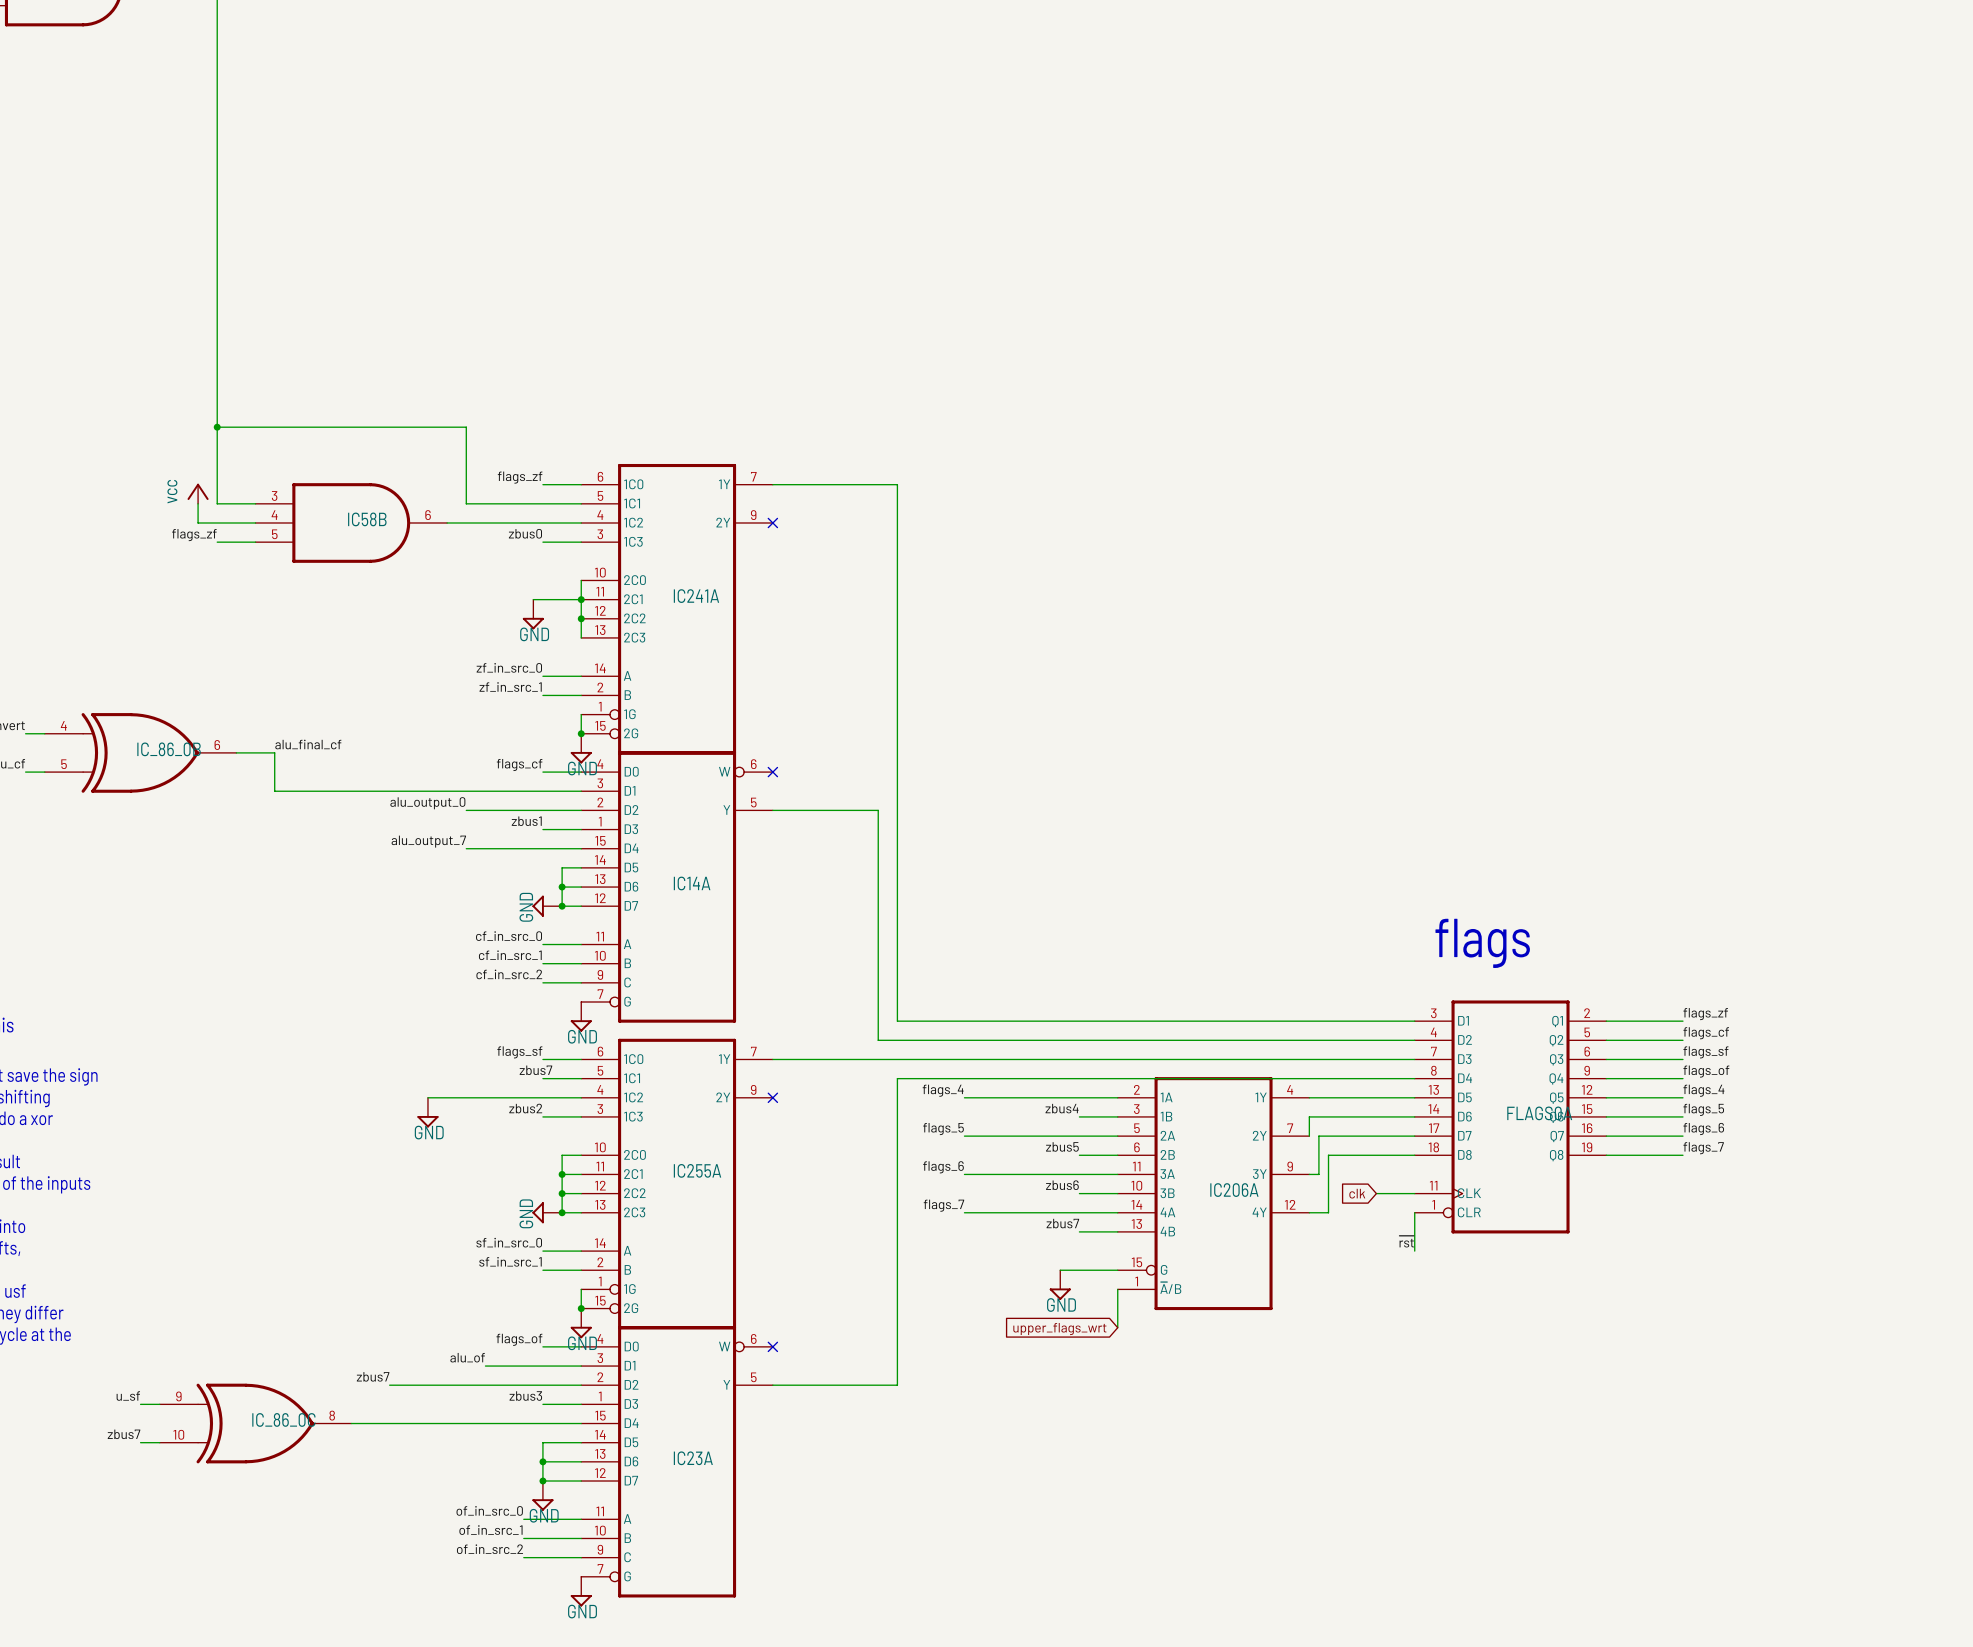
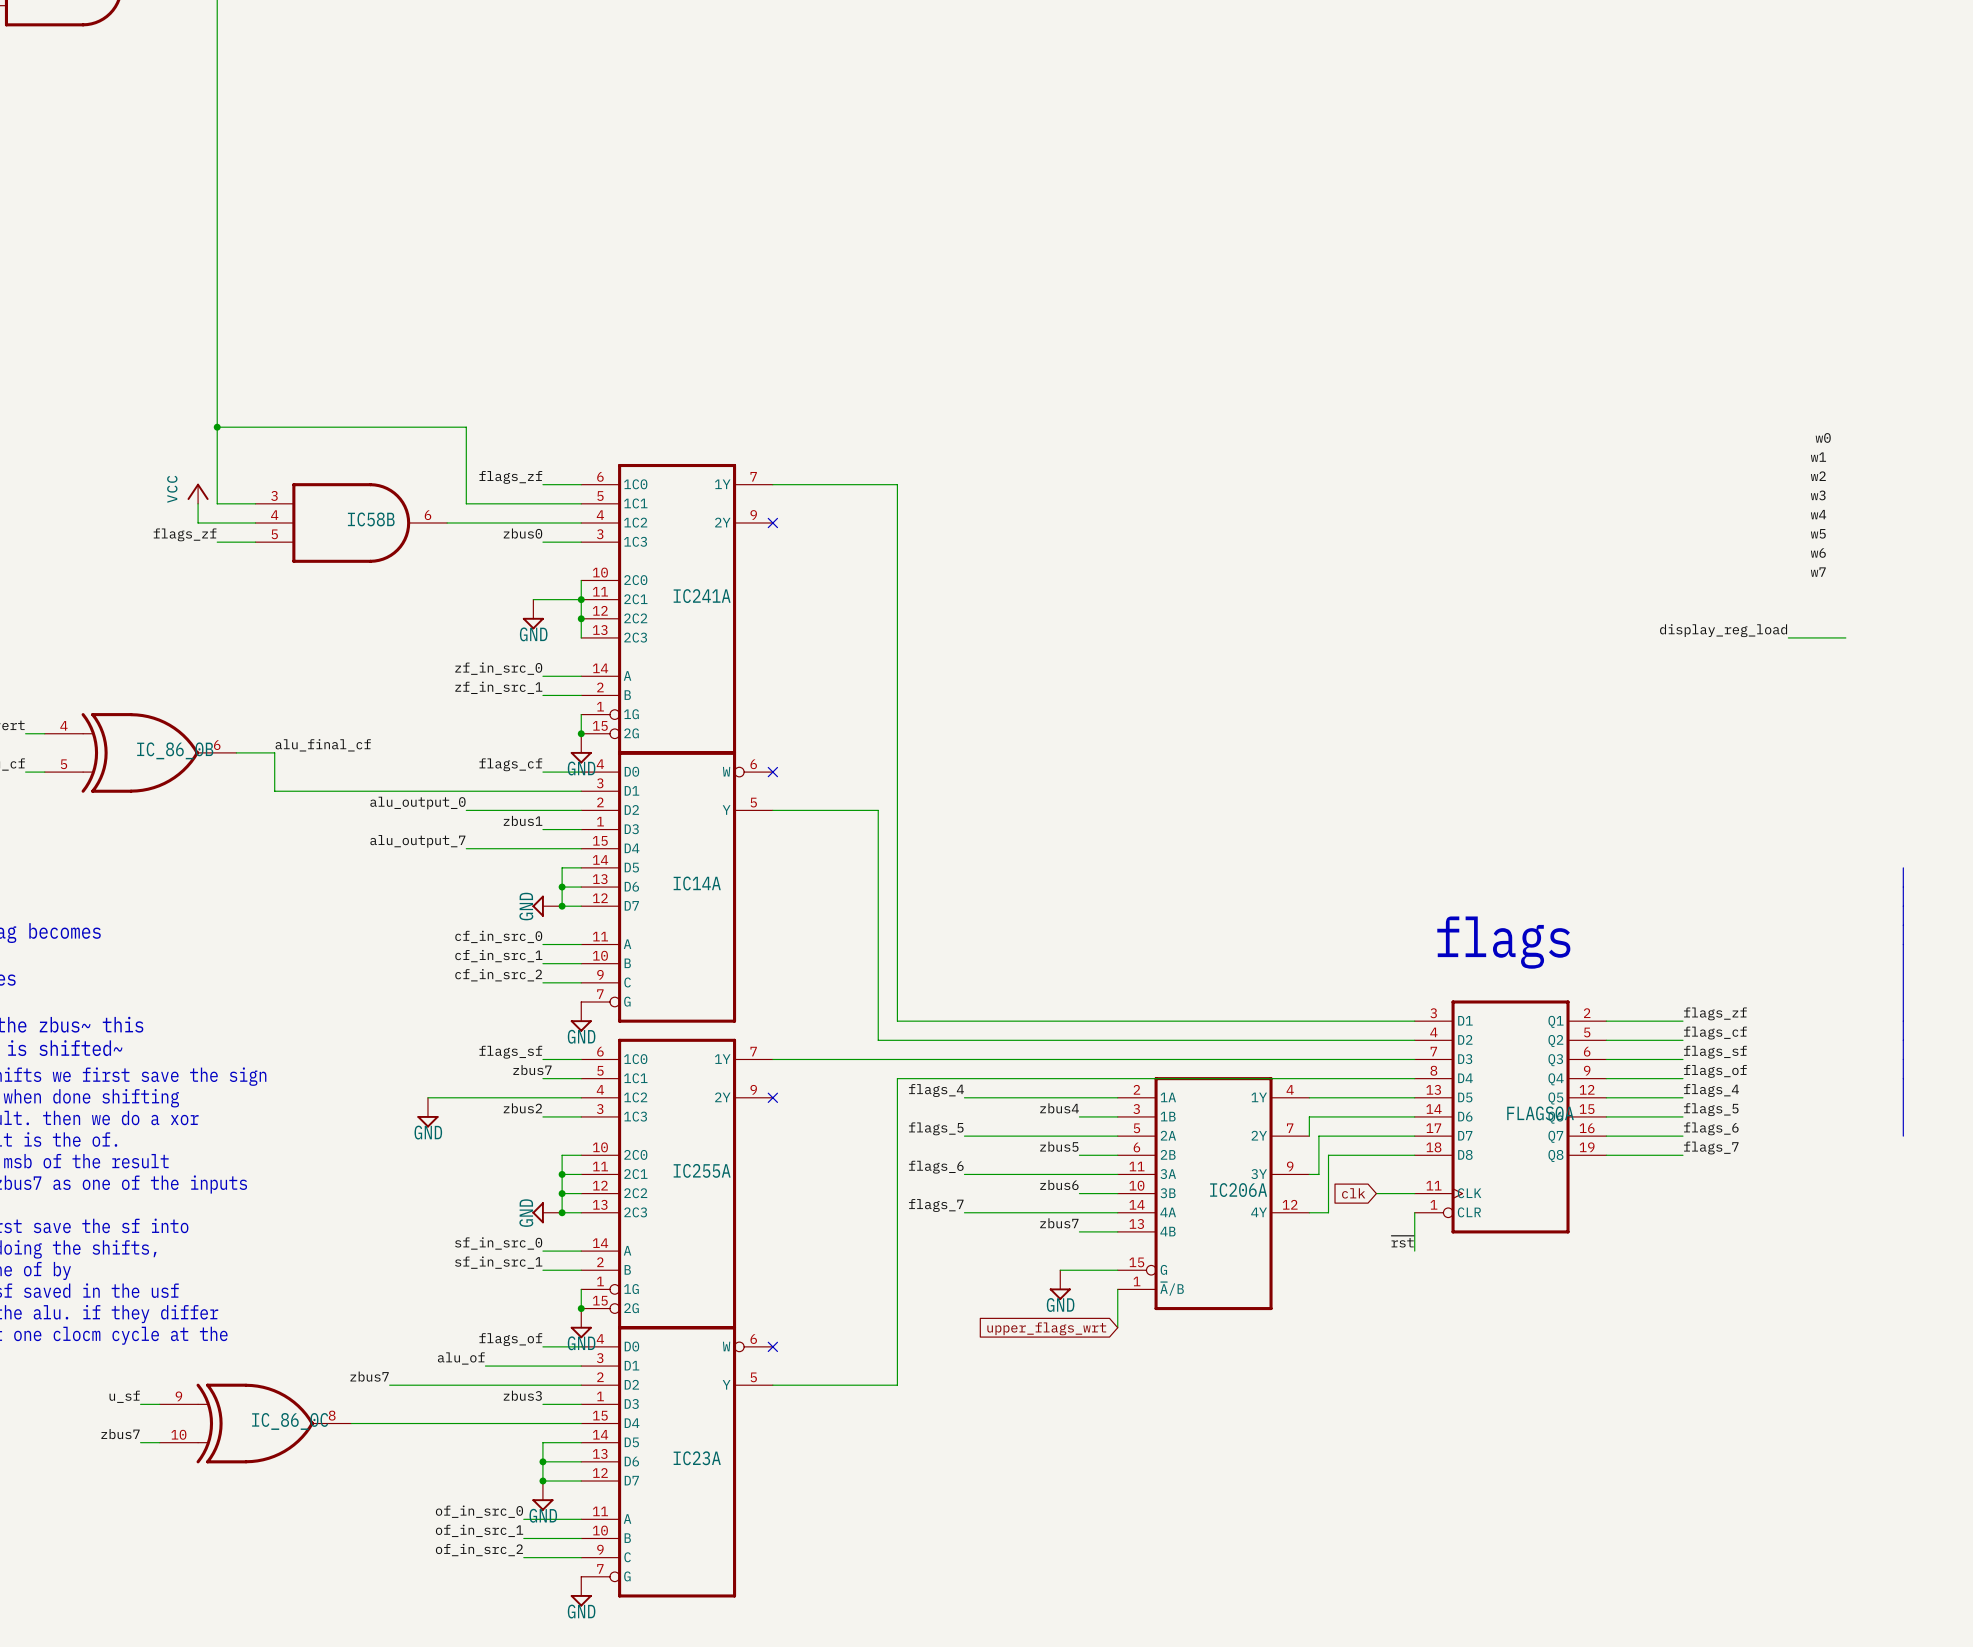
label: none -> w0 (1823, 437)
label: none -> w1 (1818, 457)
label: none -> w2 (1818, 476)
label: none -> w3 (1818, 495)
label: none -> w4 (1818, 514)
label: none -> w5 (1818, 533)
label: none -> w6 (1818, 552)
label: none -> w7 (1818, 572)
label: none -> display_reg_load (1723, 630)
wire: none -> (1788, 637) (1845, 637)
bus: none -> (1903, 867) (1903, 1136)

